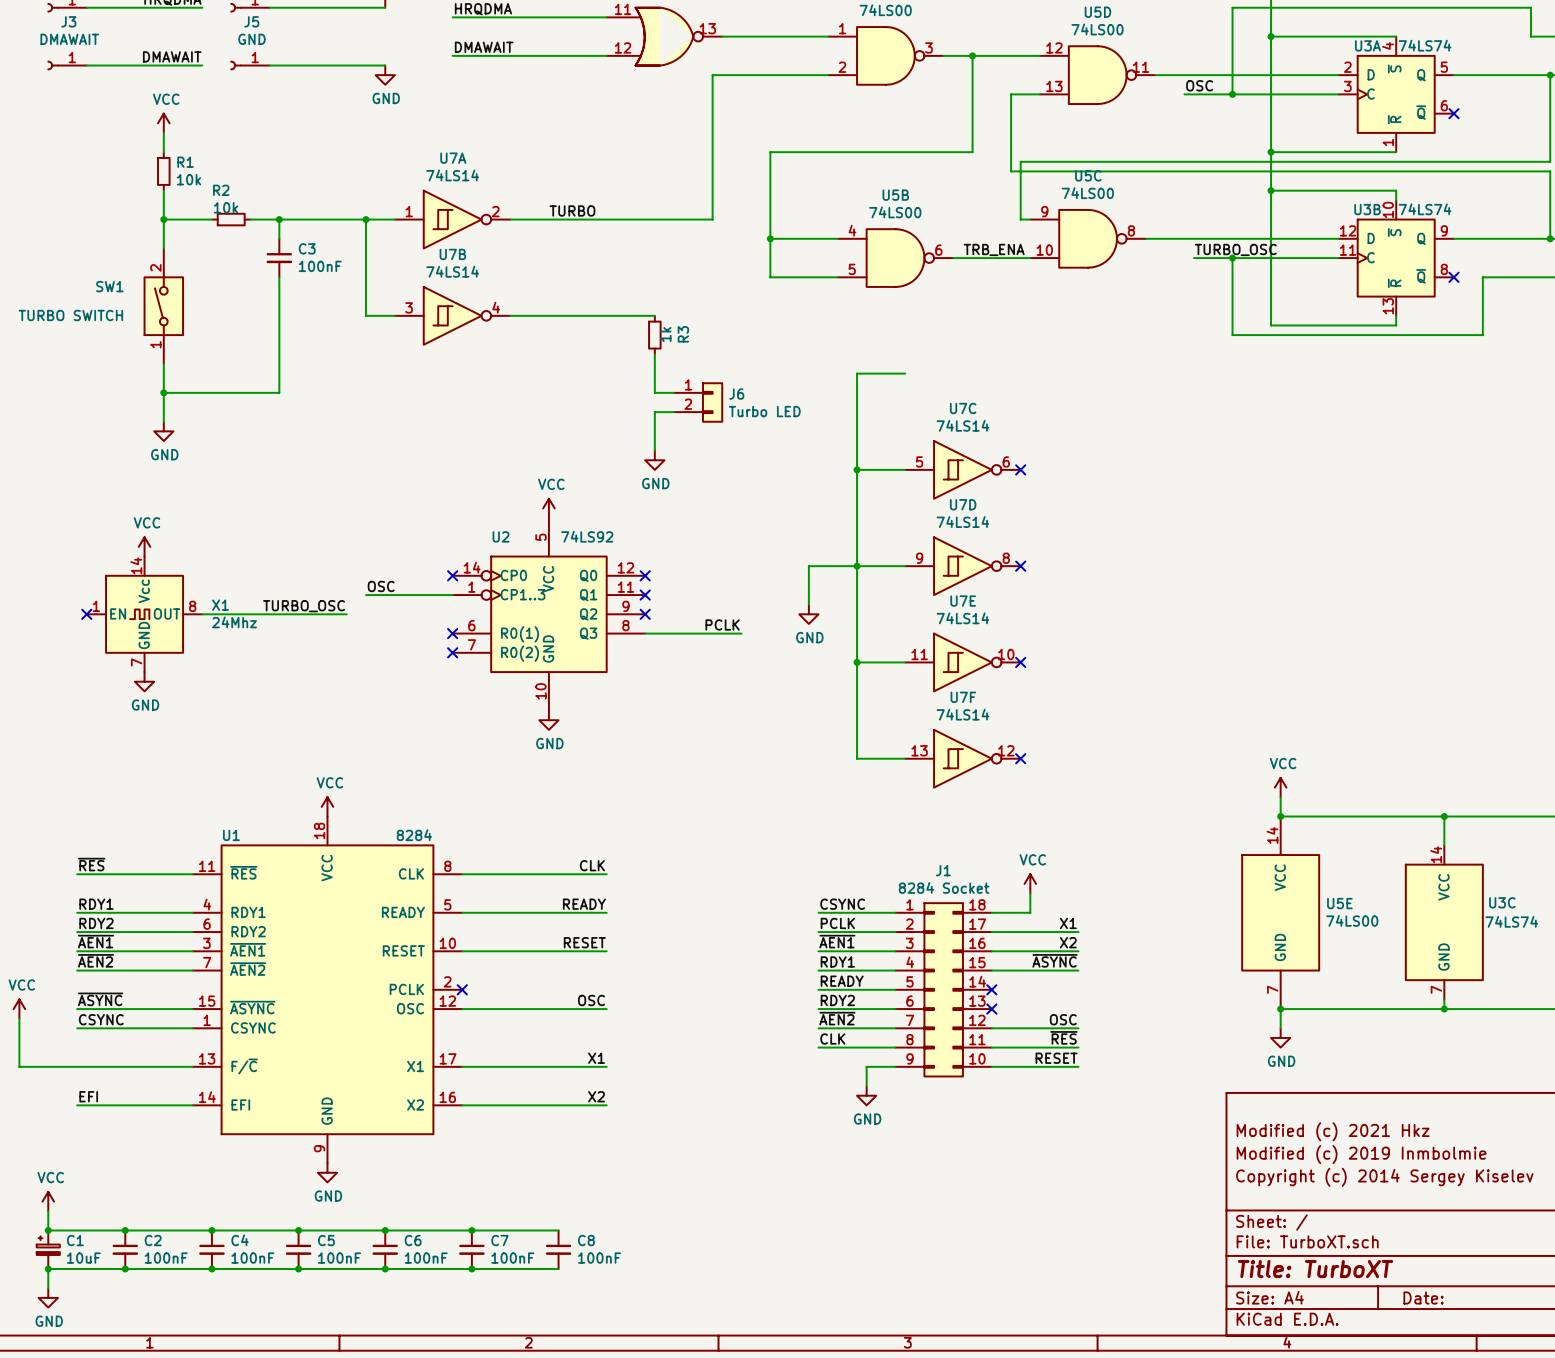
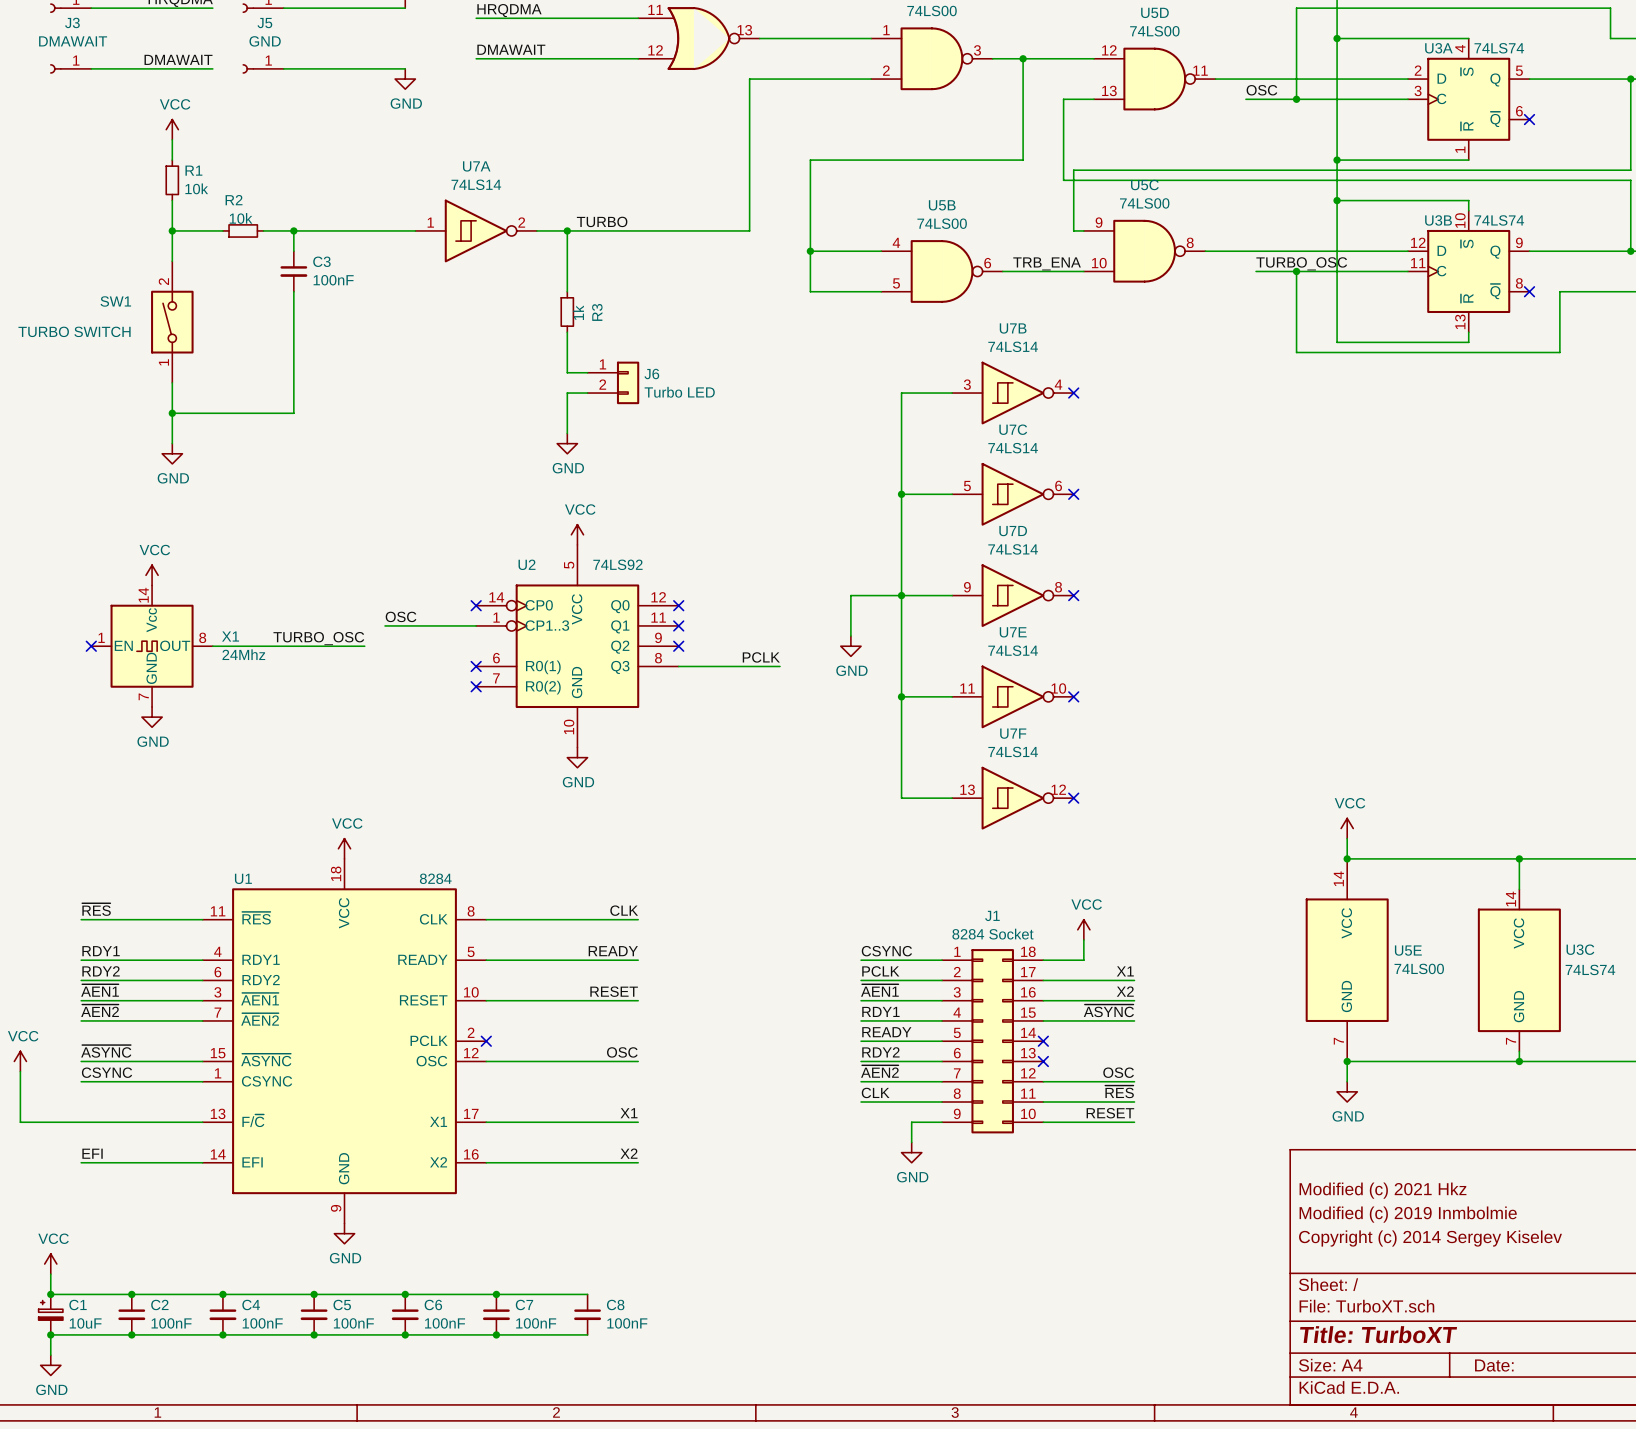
wire: (365, 219) (365, 315) (394, 315) -> none
junction: (365, 219) -> none
wire: none -> (567, 230) (567, 291)
junction: none -> (567, 230)
U7B position: (452, 315) -> (1012, 393)
wire: (510, 315) (654, 315) -> none
R3 position: (654, 335) -> (567, 311)
wire: (654, 354) (654, 392) (674, 392) -> (567, 332) (567, 372) (587, 372)
no-connect mark: none -> (1073, 393)
J6 position: (698, 402) -> (613, 382)
wire: (674, 412) (654, 412) (654, 450) -> (587, 393) (567, 393) (567, 433)
power symbol position: GND (654, 460) -> GND (567, 443)

